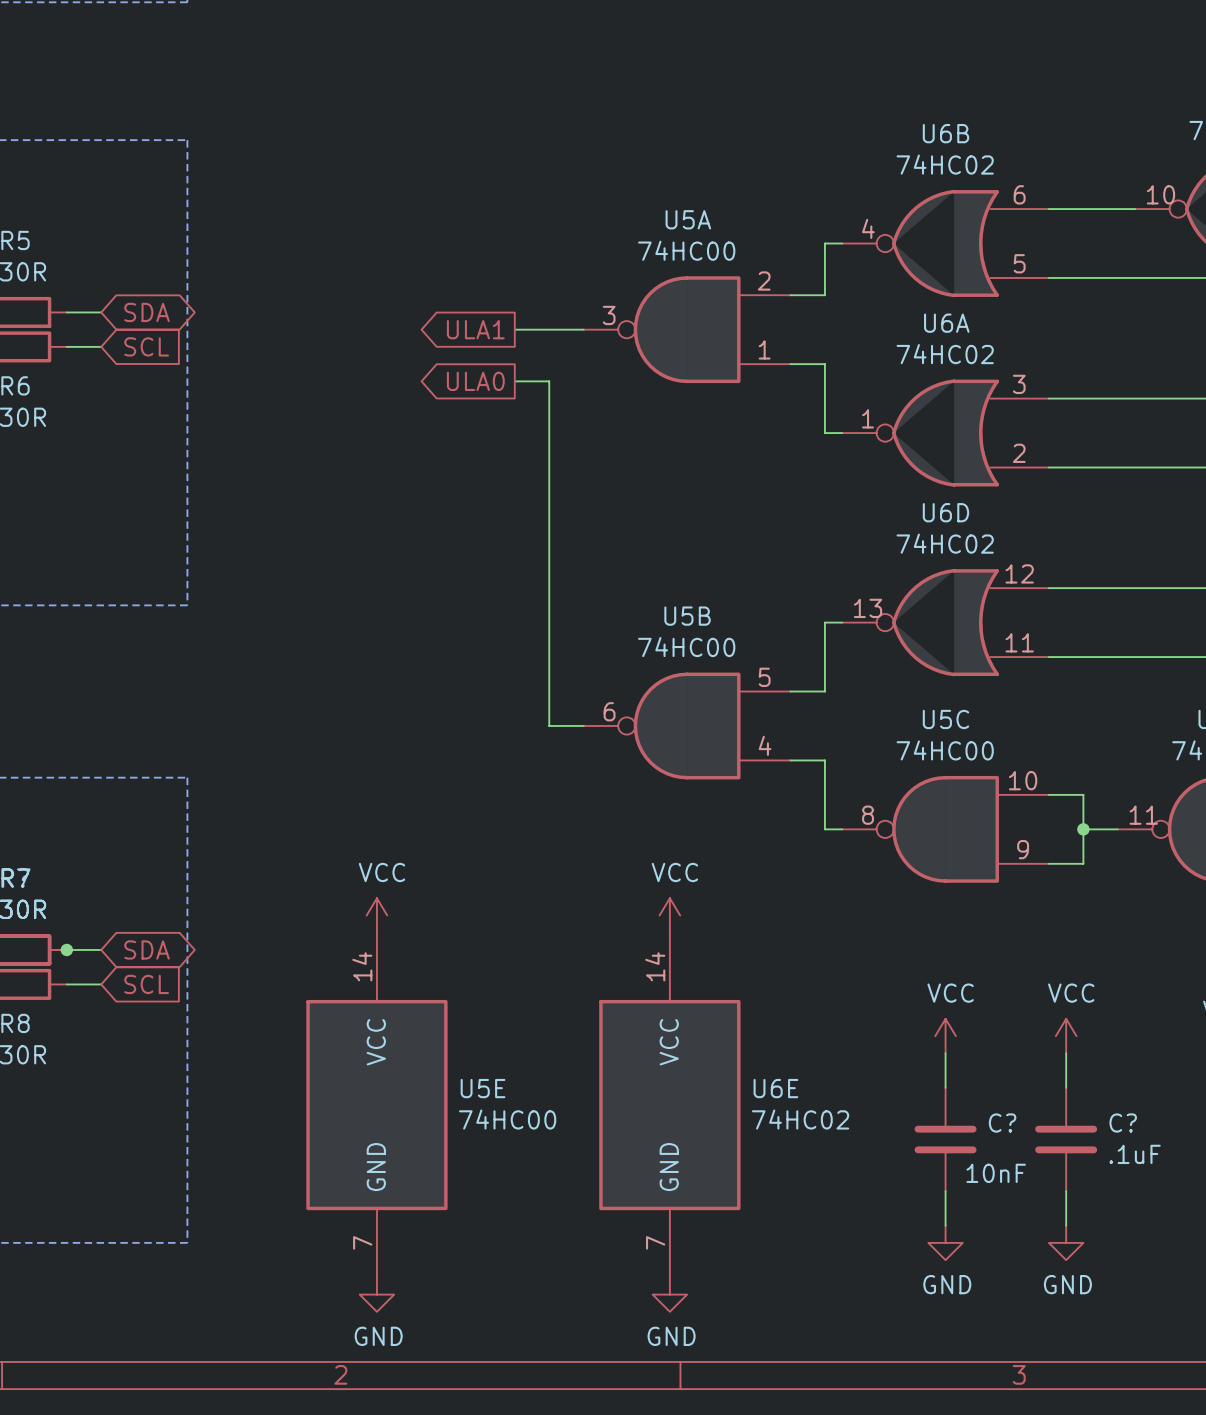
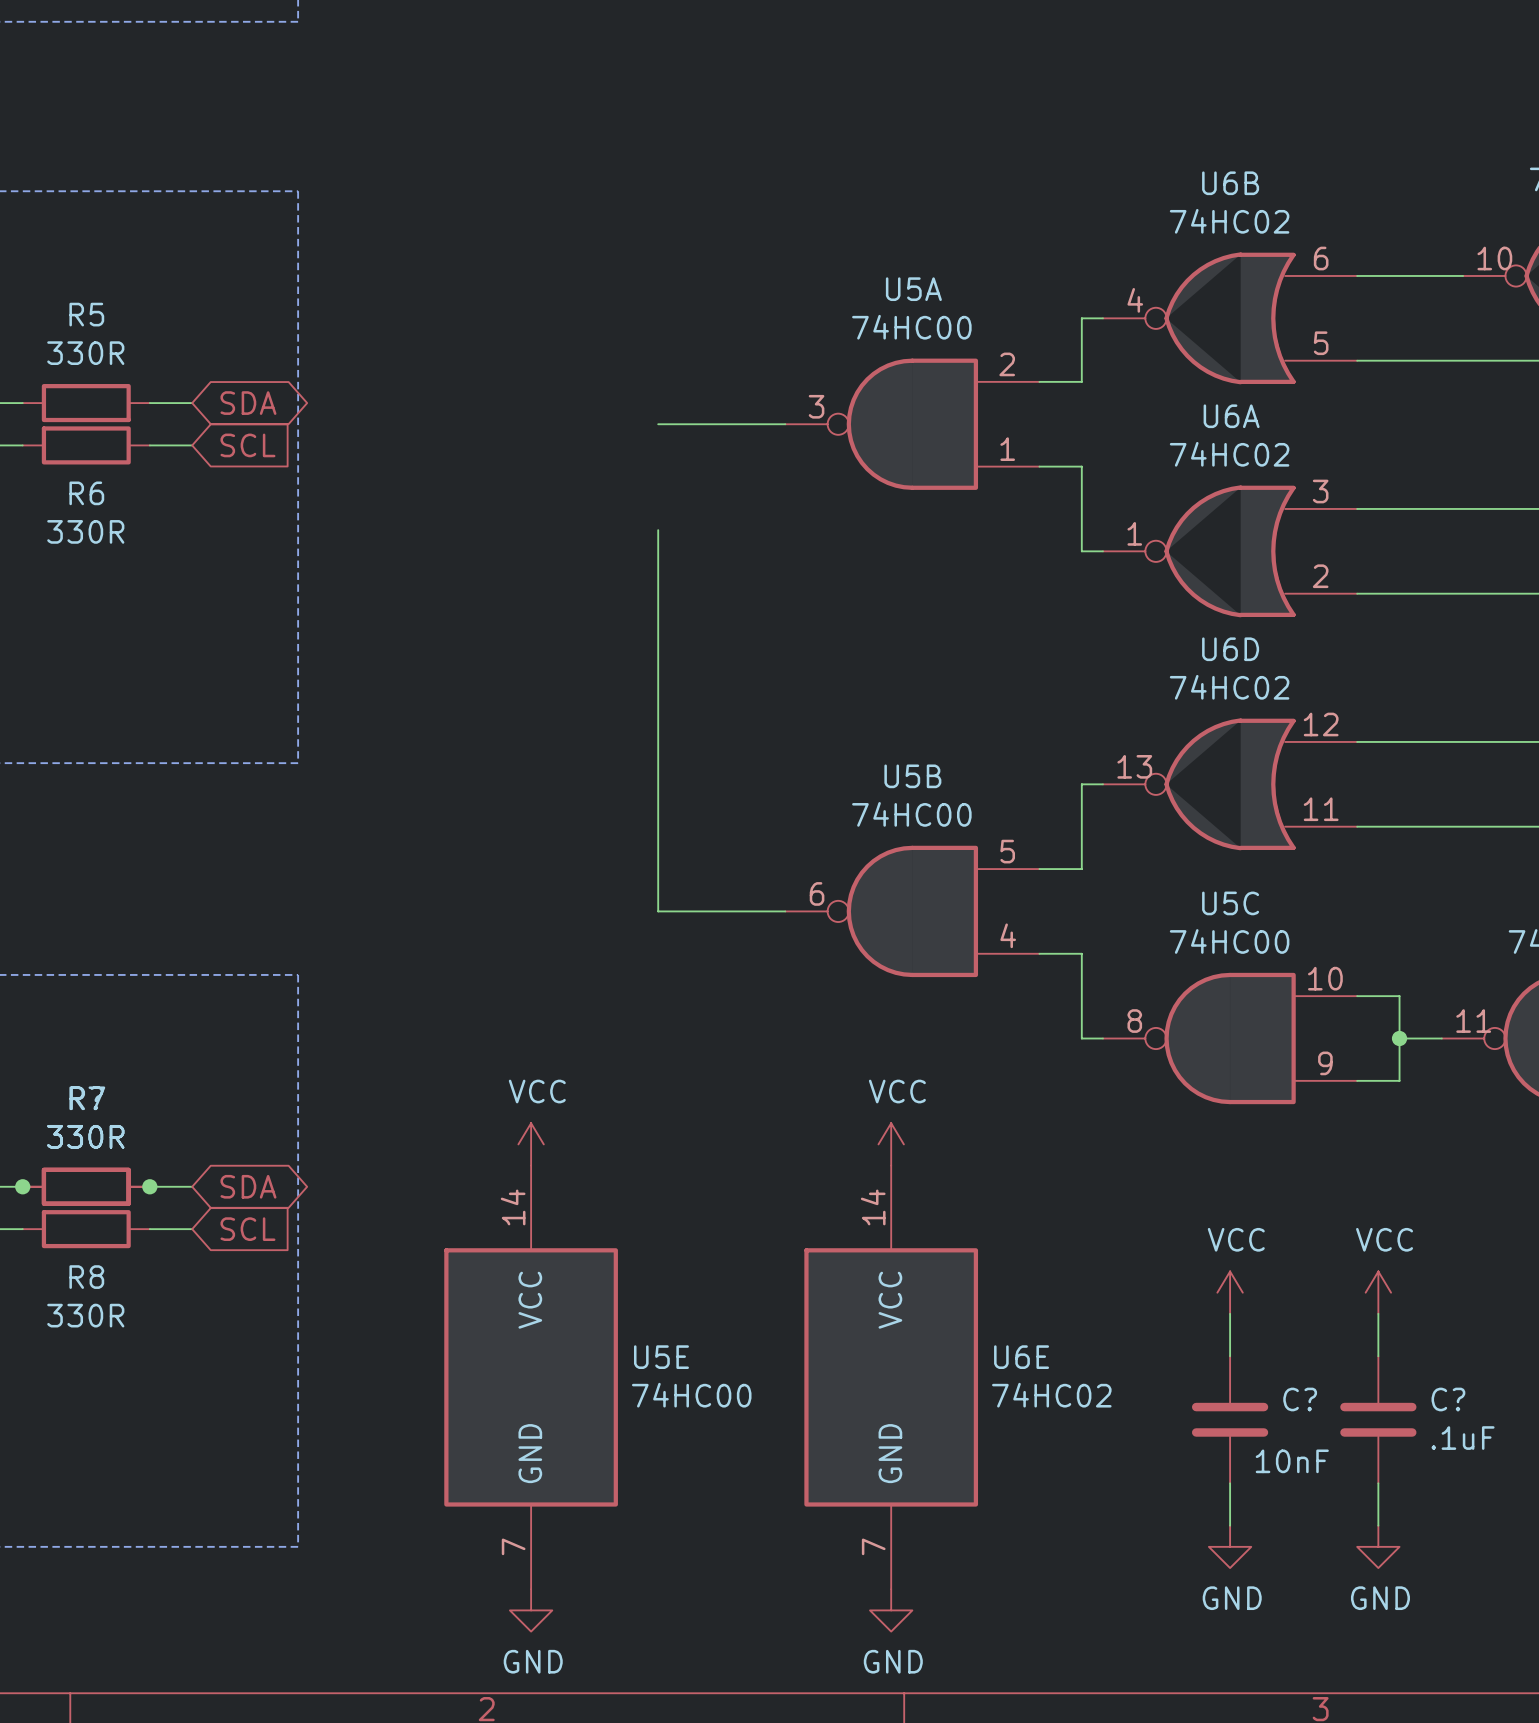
global label: ULA1 (475, 329) -> none
wire: none -> (658, 424) (700, 424)
global label: ULA0 (475, 381) -> none
wire: (514, 381) (549, 381) (549, 725) -> (658, 530) (658, 911) (742, 911)

